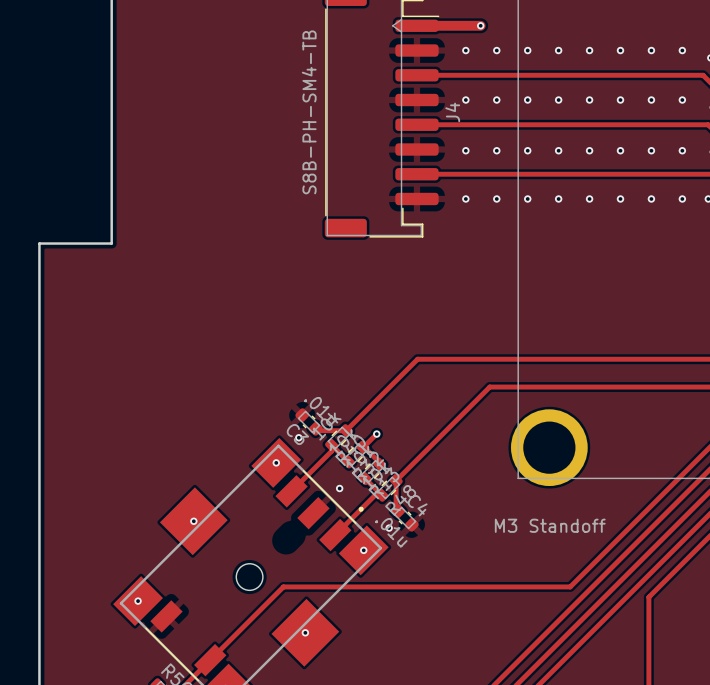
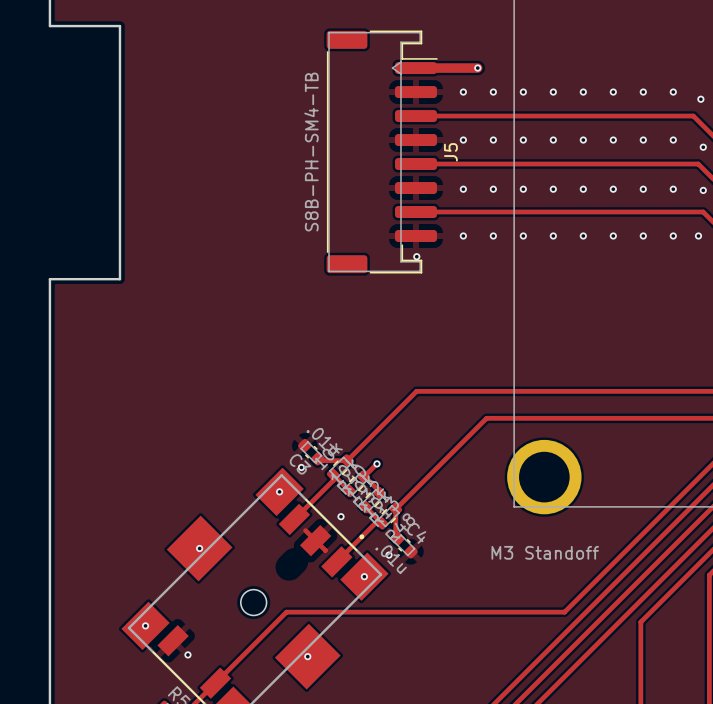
J4 name: J4 (452, 112) -> J5 (450, 152)
via: none -> (416, 256)
track: none -> (305, 530) (325, 550)
via: none -> (187, 654)

